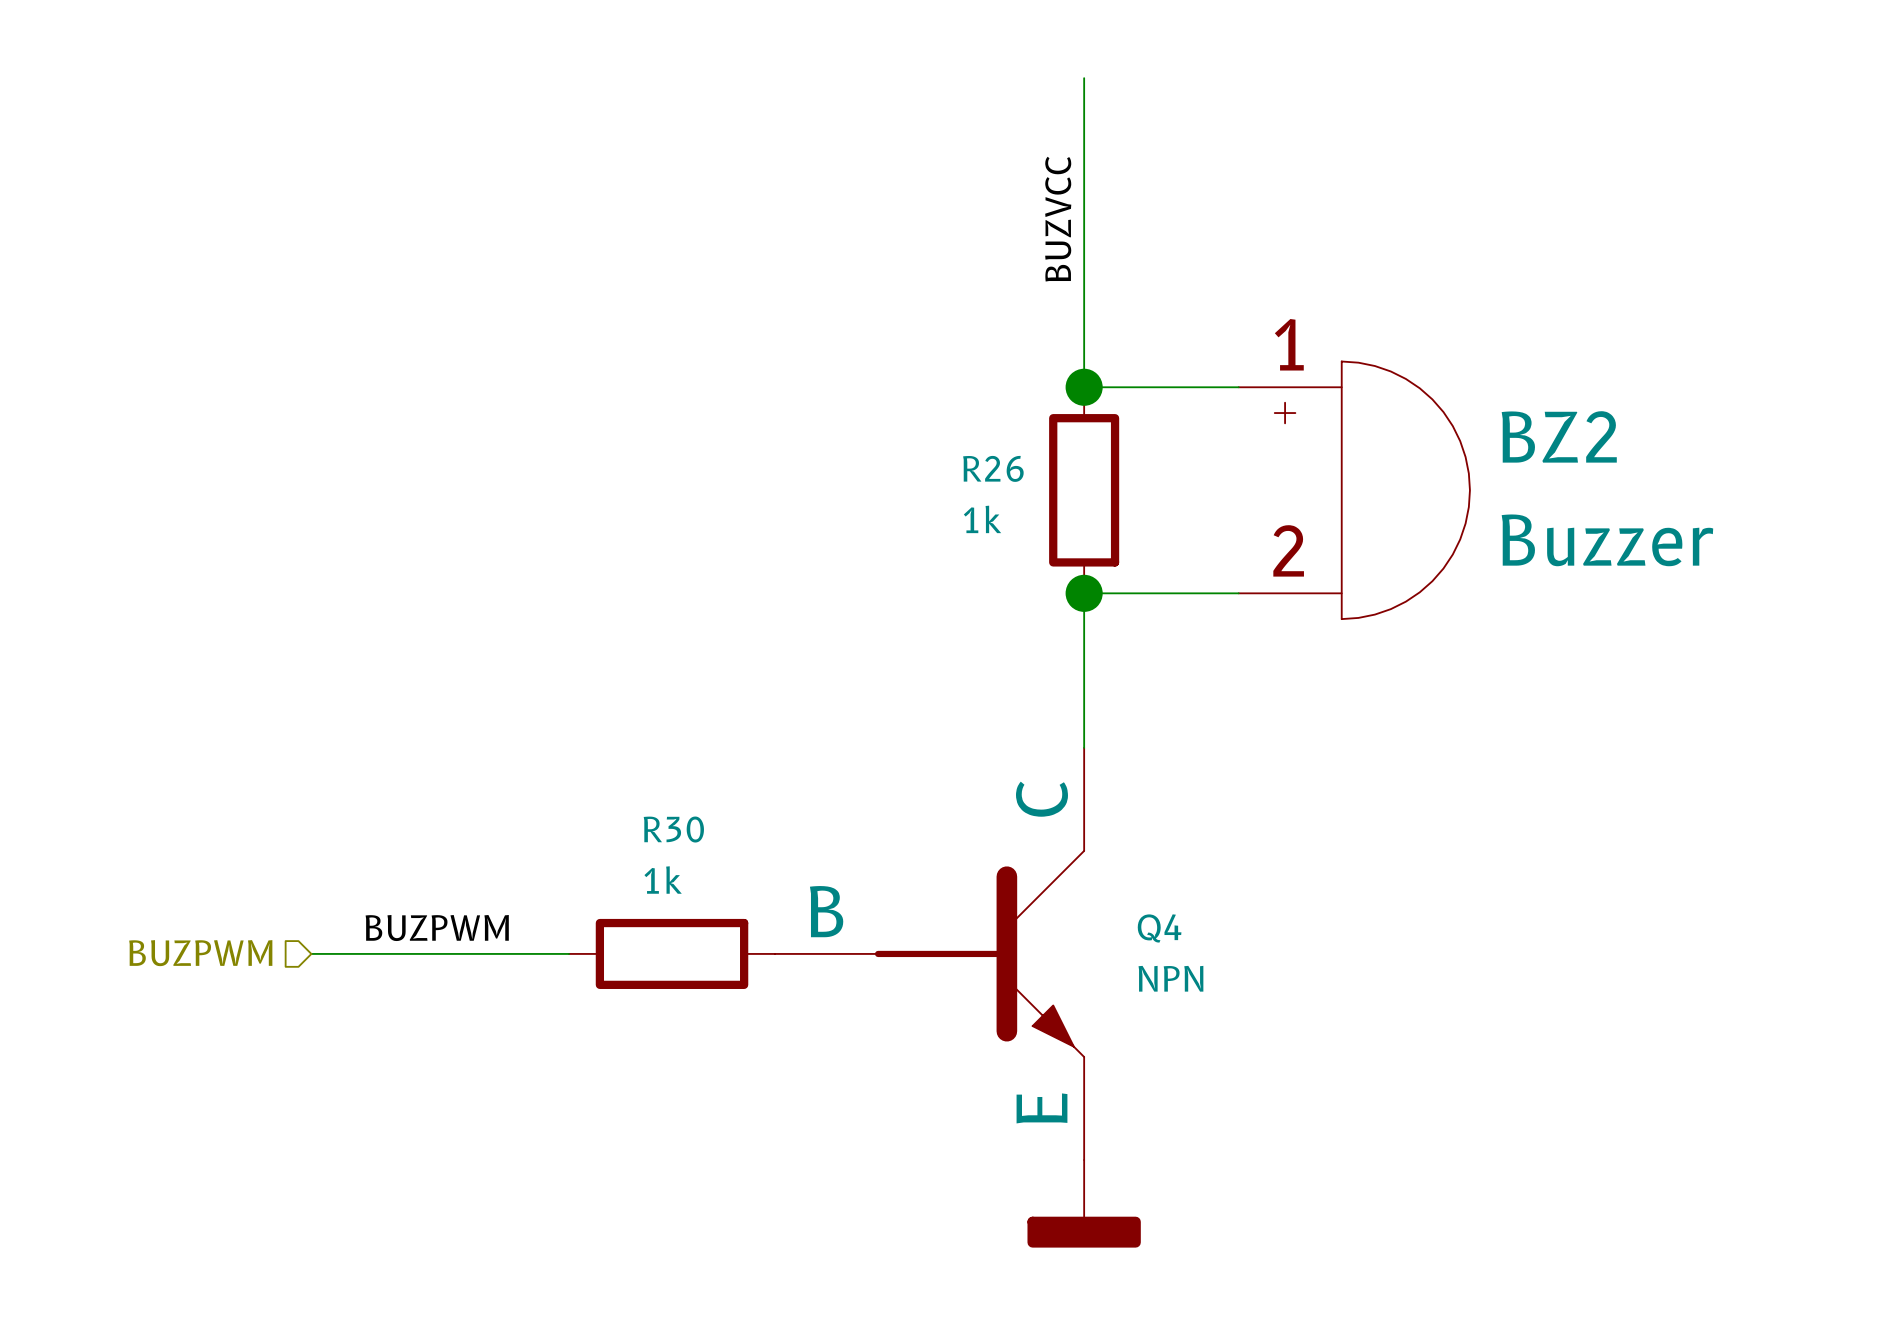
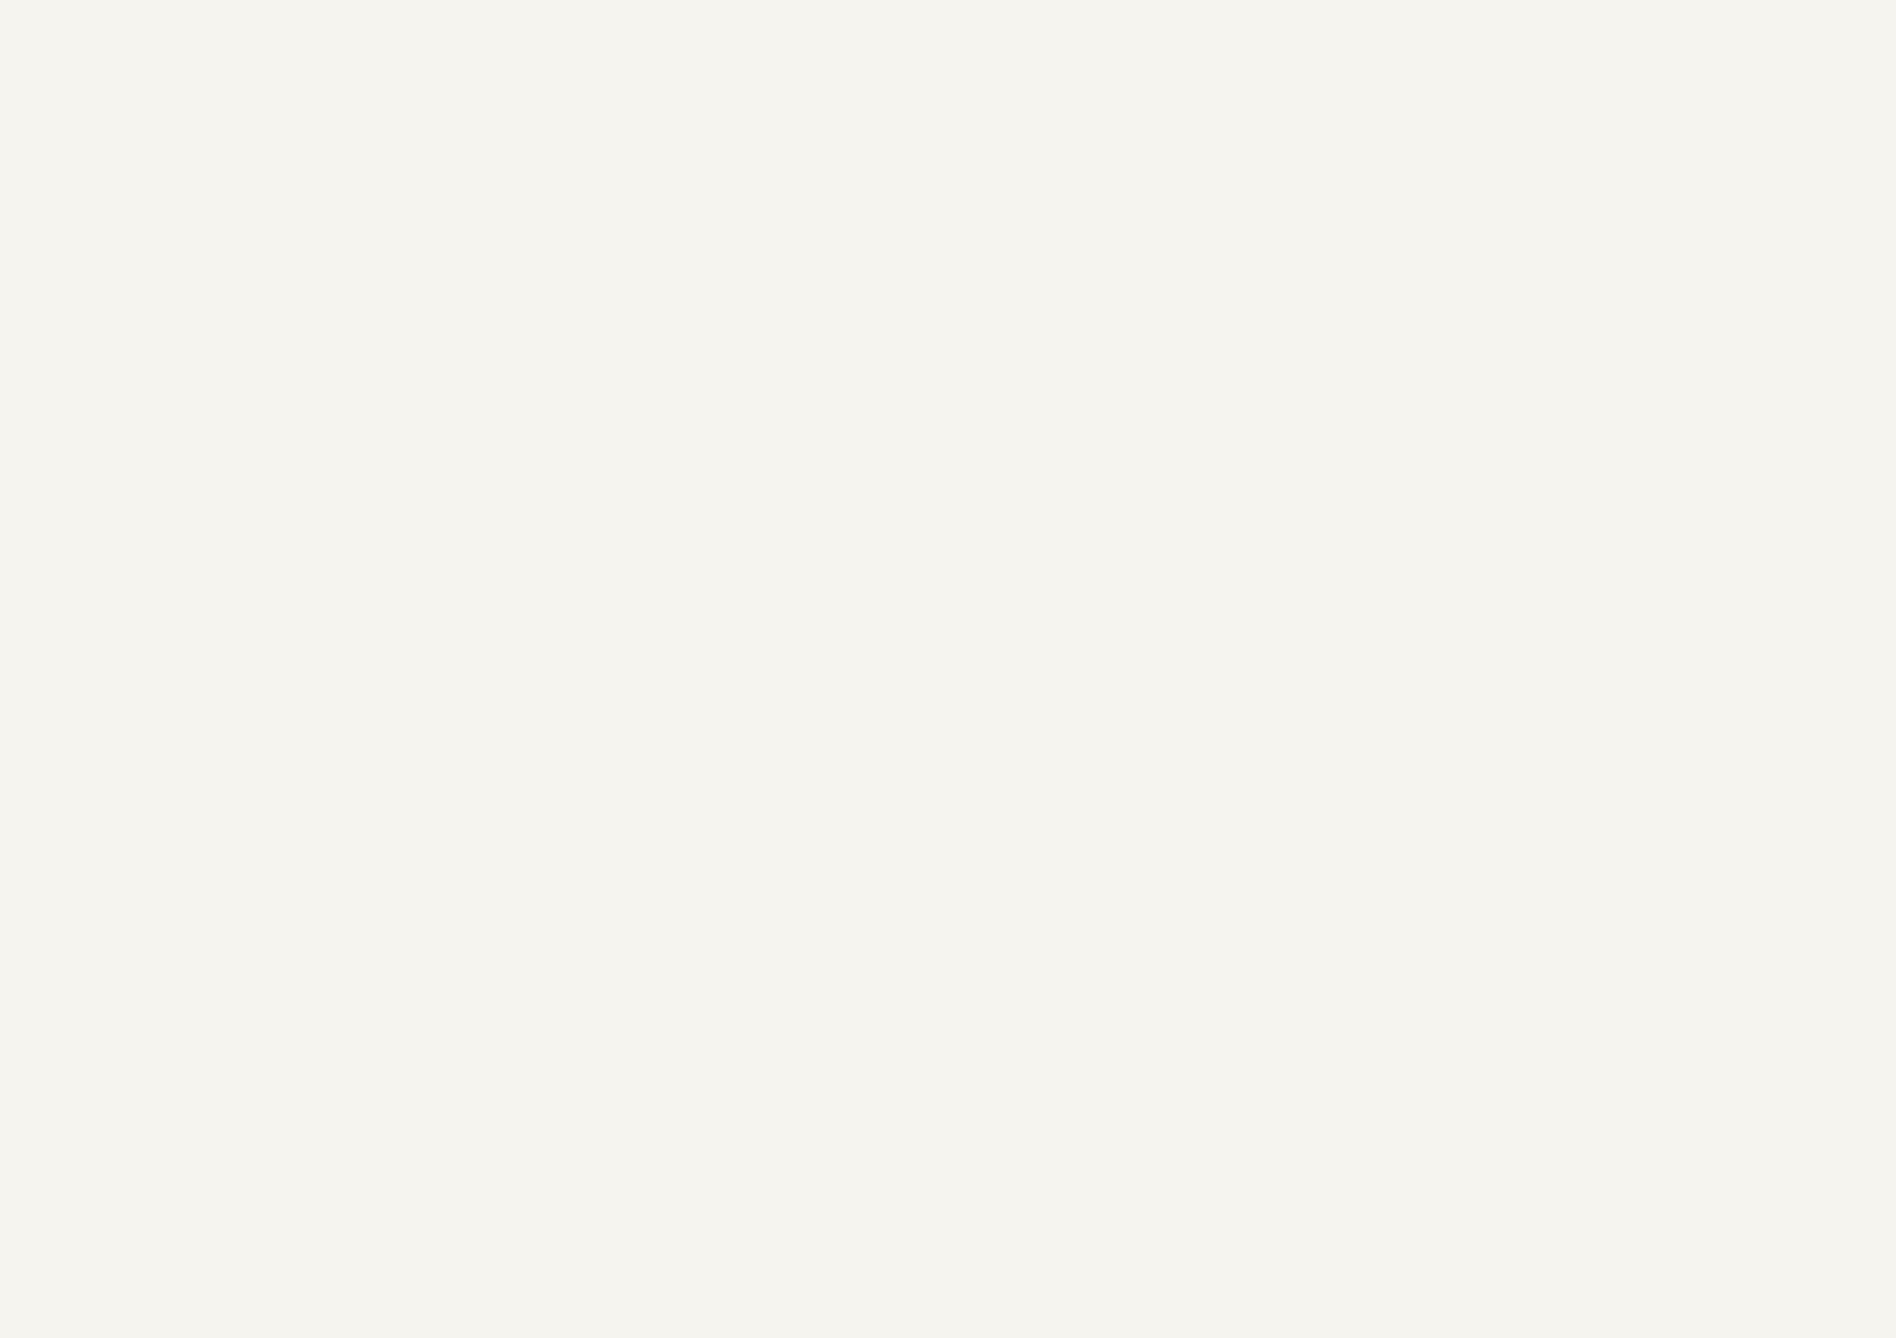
wire: (1084, 78) (1084, 387) (1238, 387) -> none
label: BUZVCC (1058, 219) -> none
junction: (1084, 387) -> none
R26: 1k (1084, 490) -> none
BZ2: Buzzer (1354, 490) -> none
junction: (1084, 593) -> none
wire: (1238, 593) (1084, 593) (1084, 747) -> none
label: BUZPWM (437, 928) -> none
hierarchical label: BUZPWM (200, 953) -> none
wire: (311, 953) (568, 953) -> none
R30: 1k (672, 953) -> none
Q4: NPN (936, 953) -> none
power symbol: (1084, 1203) -> none

